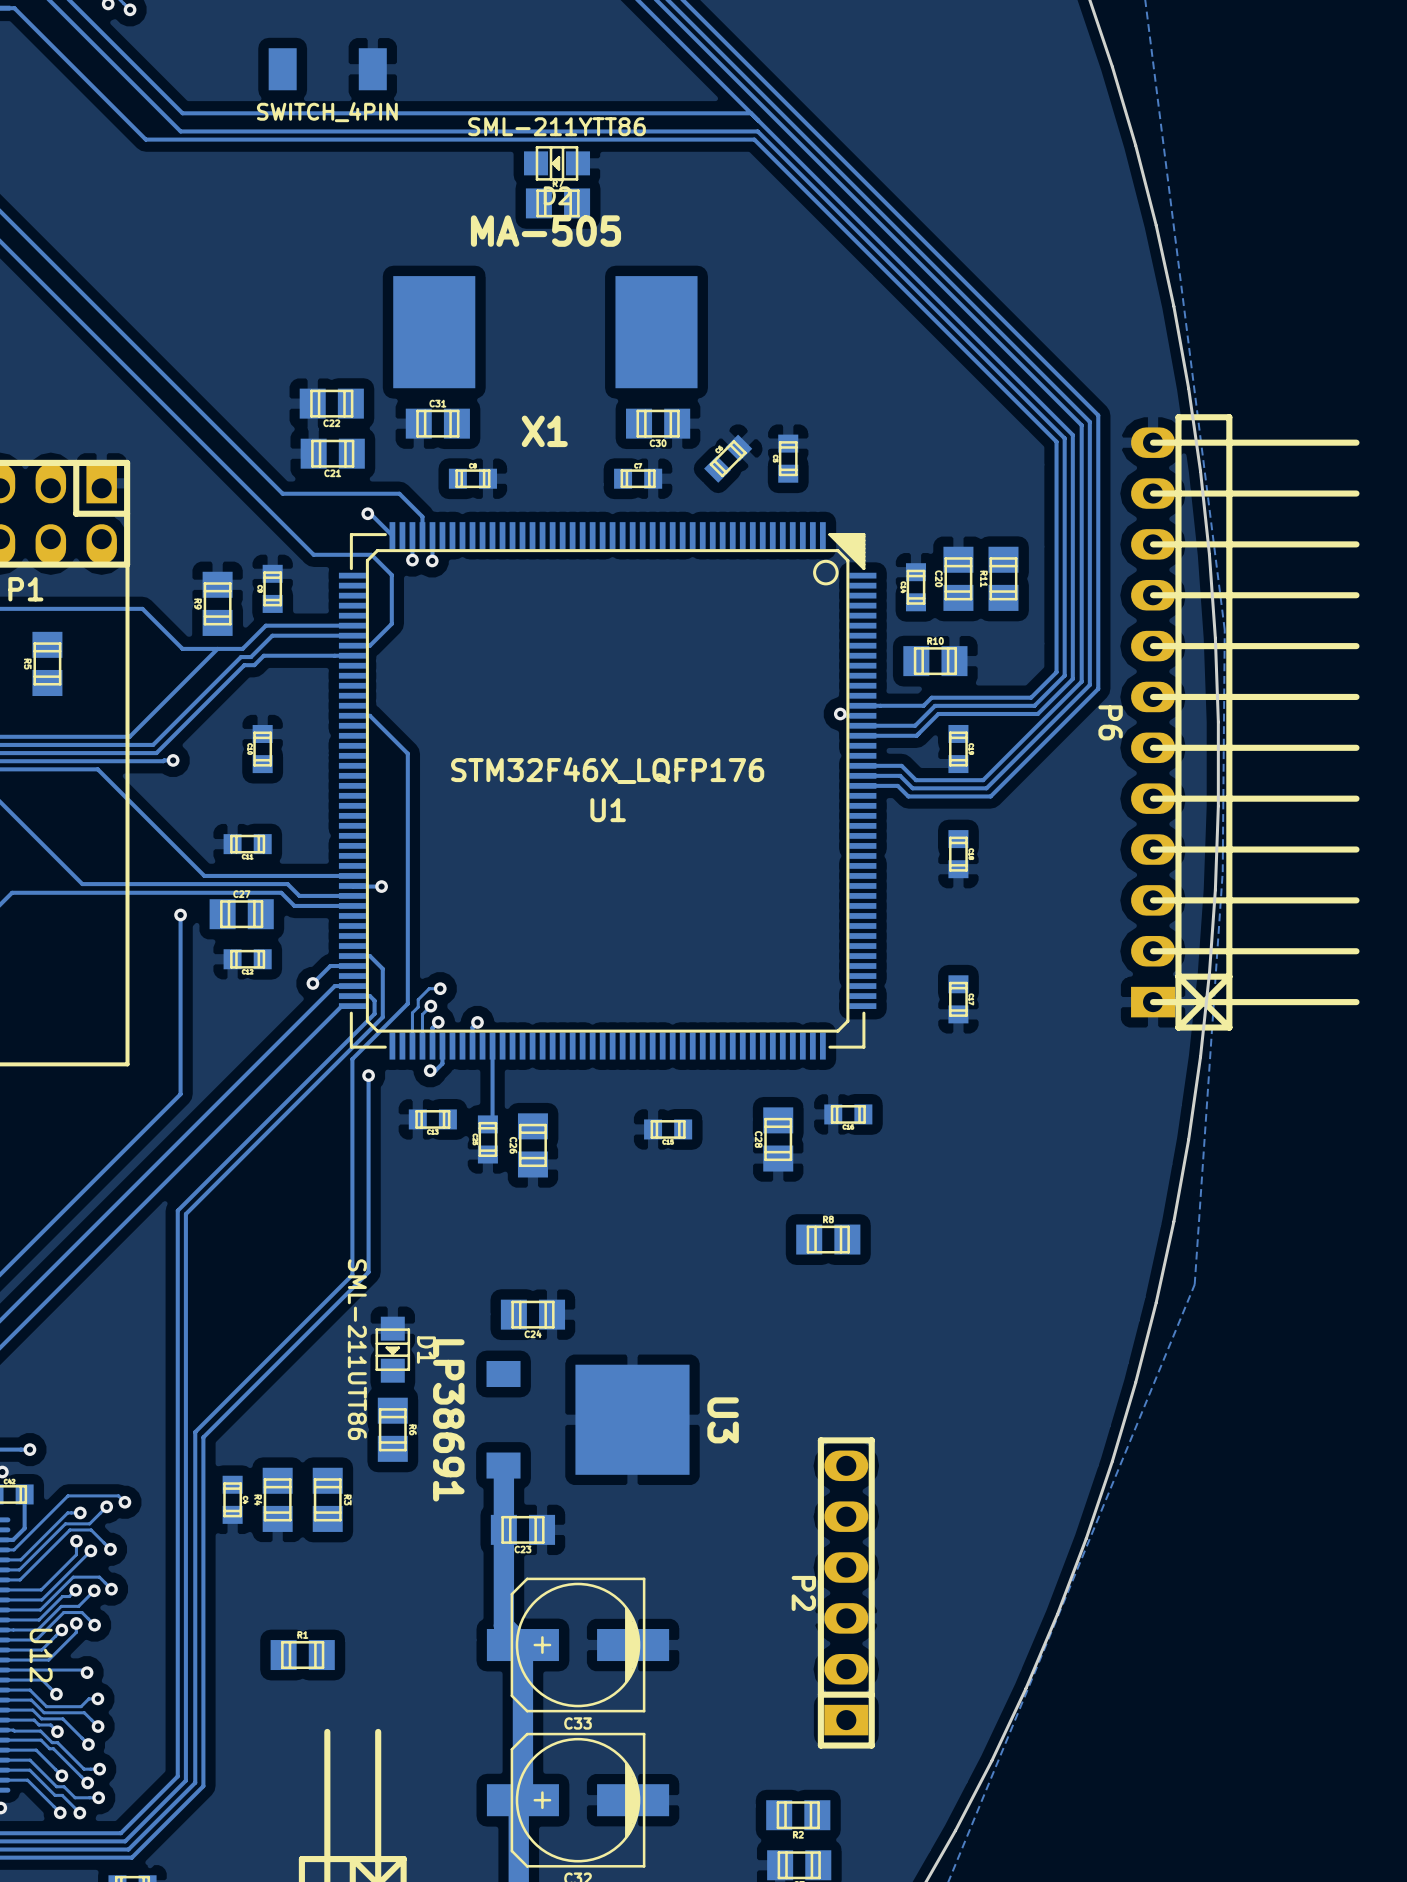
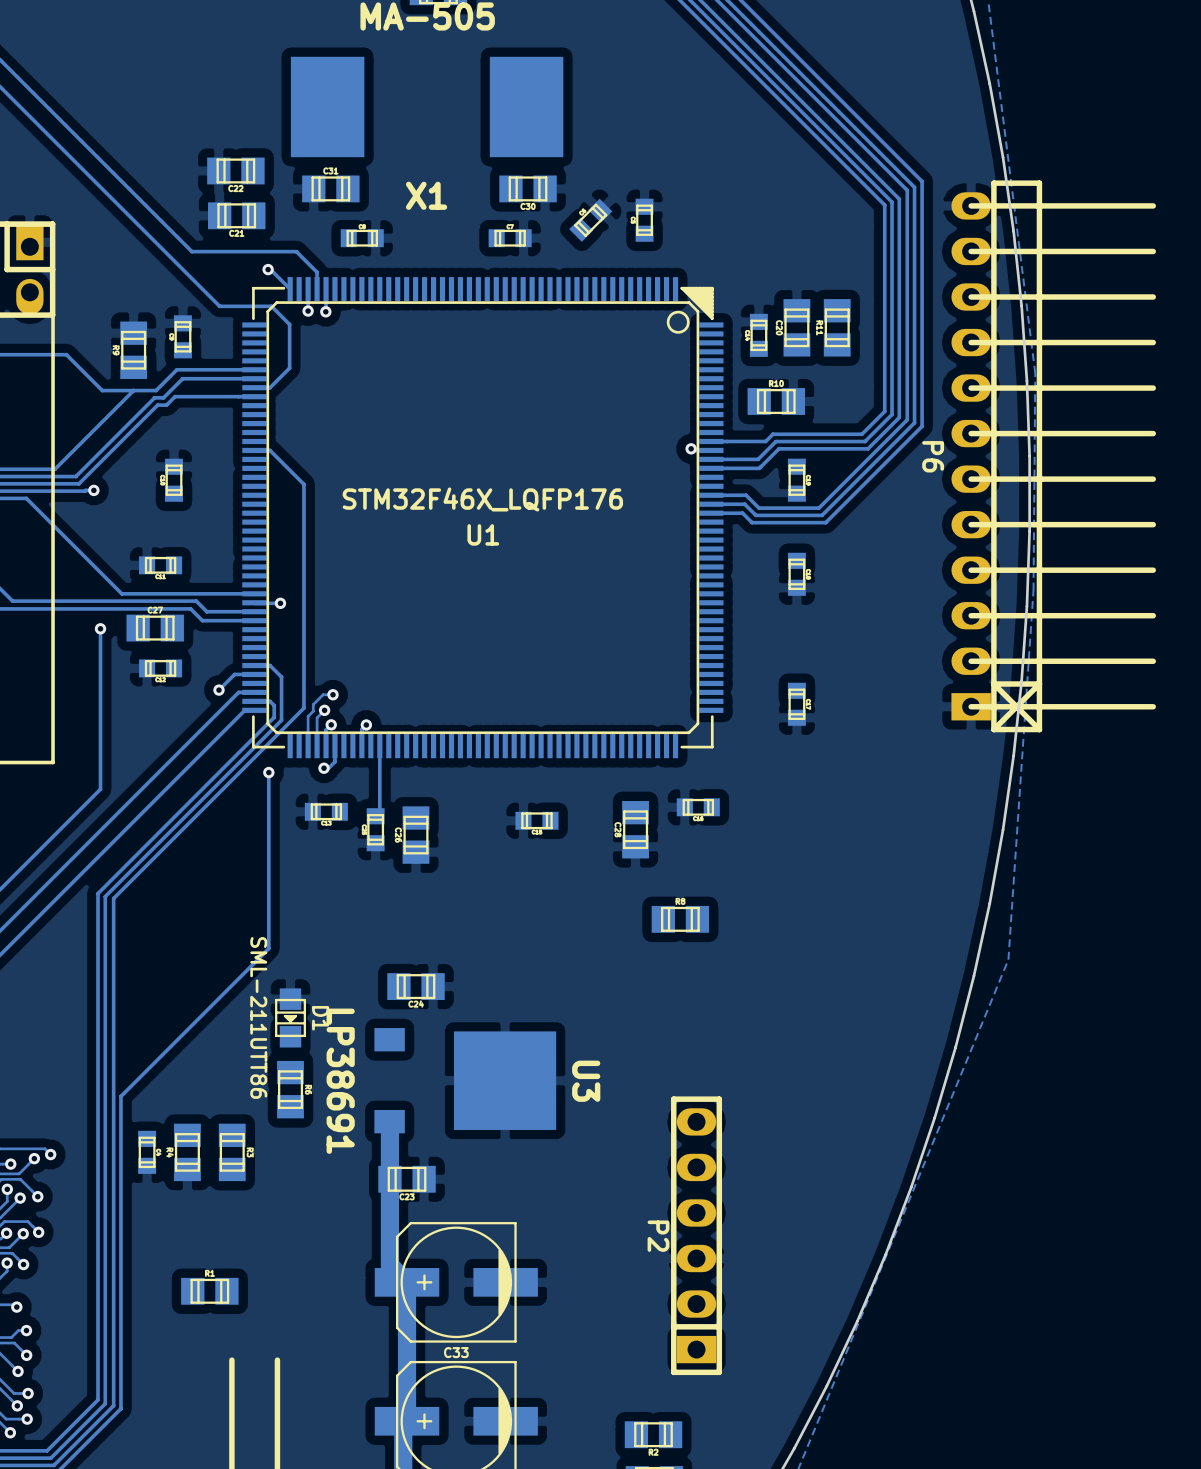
track: (352, 1059) (352, 1274) (195, 1432) -> (254, 757) (113, 898) (113, 1091)

